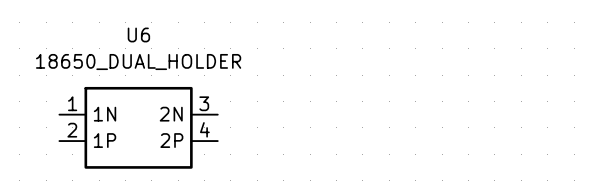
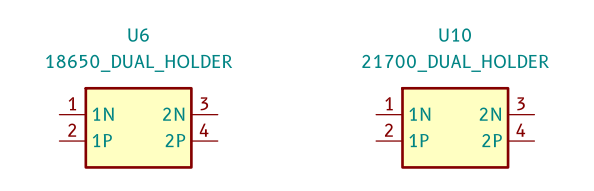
U10: none -> 21700_DUAL_HOLDER (455, 127)

